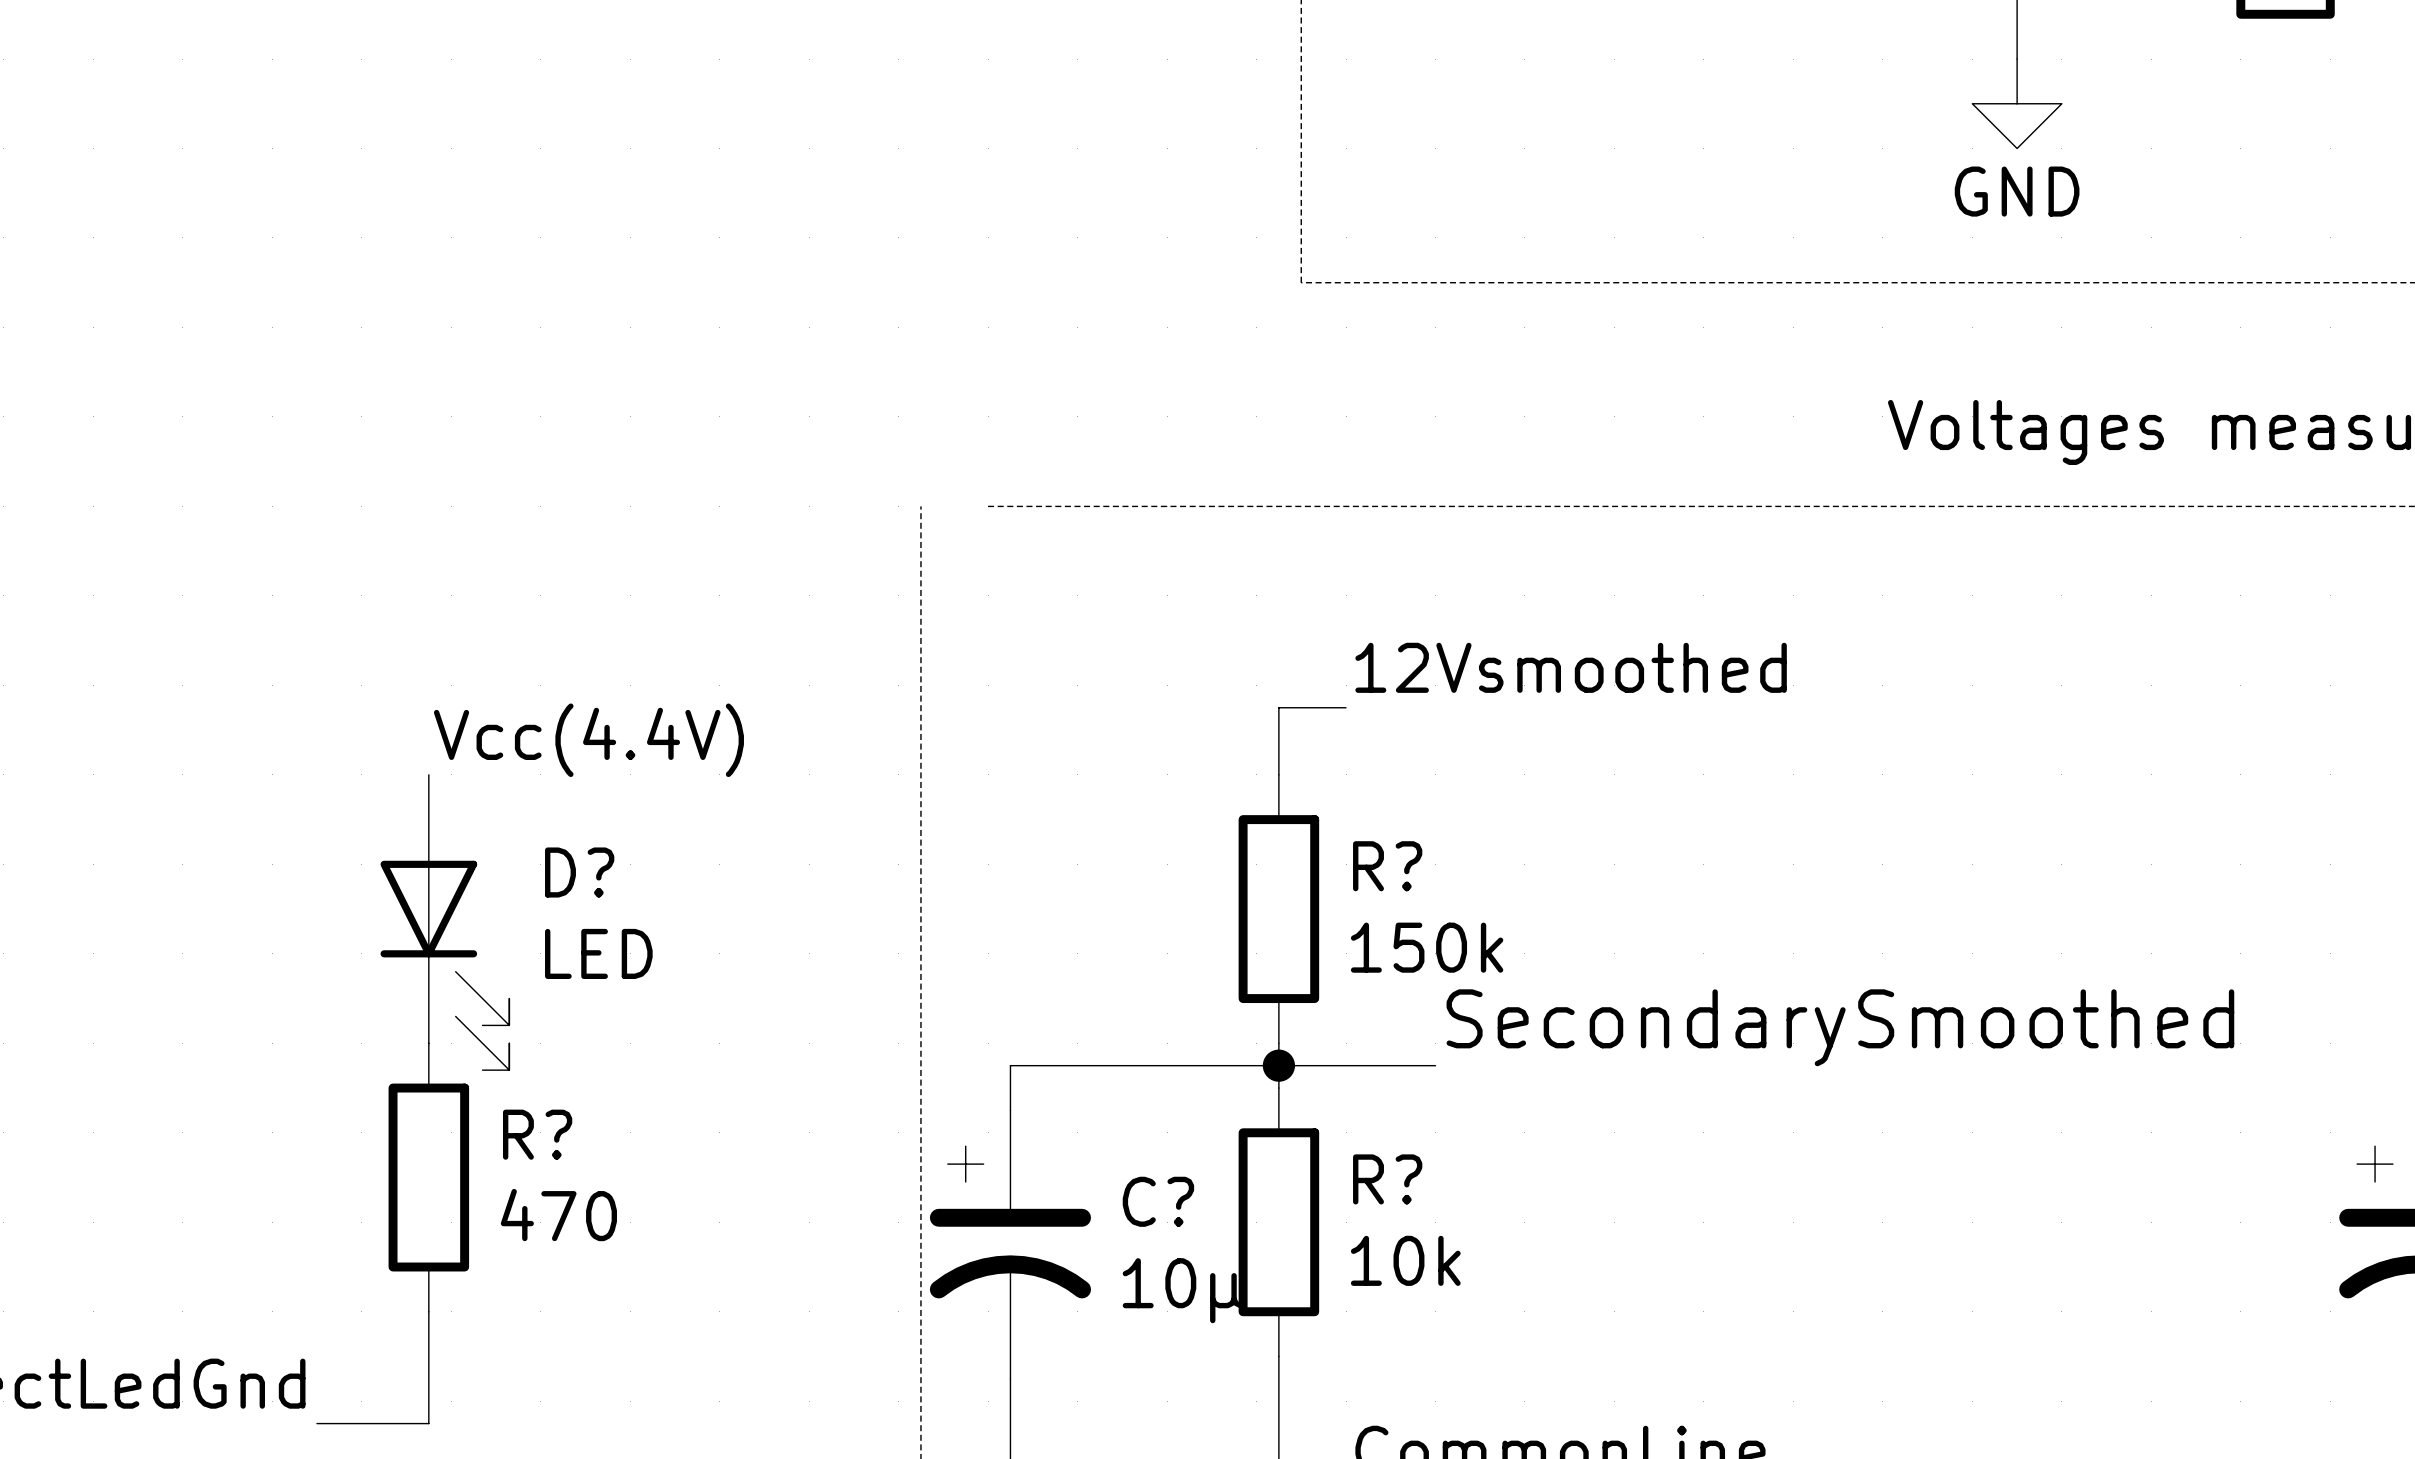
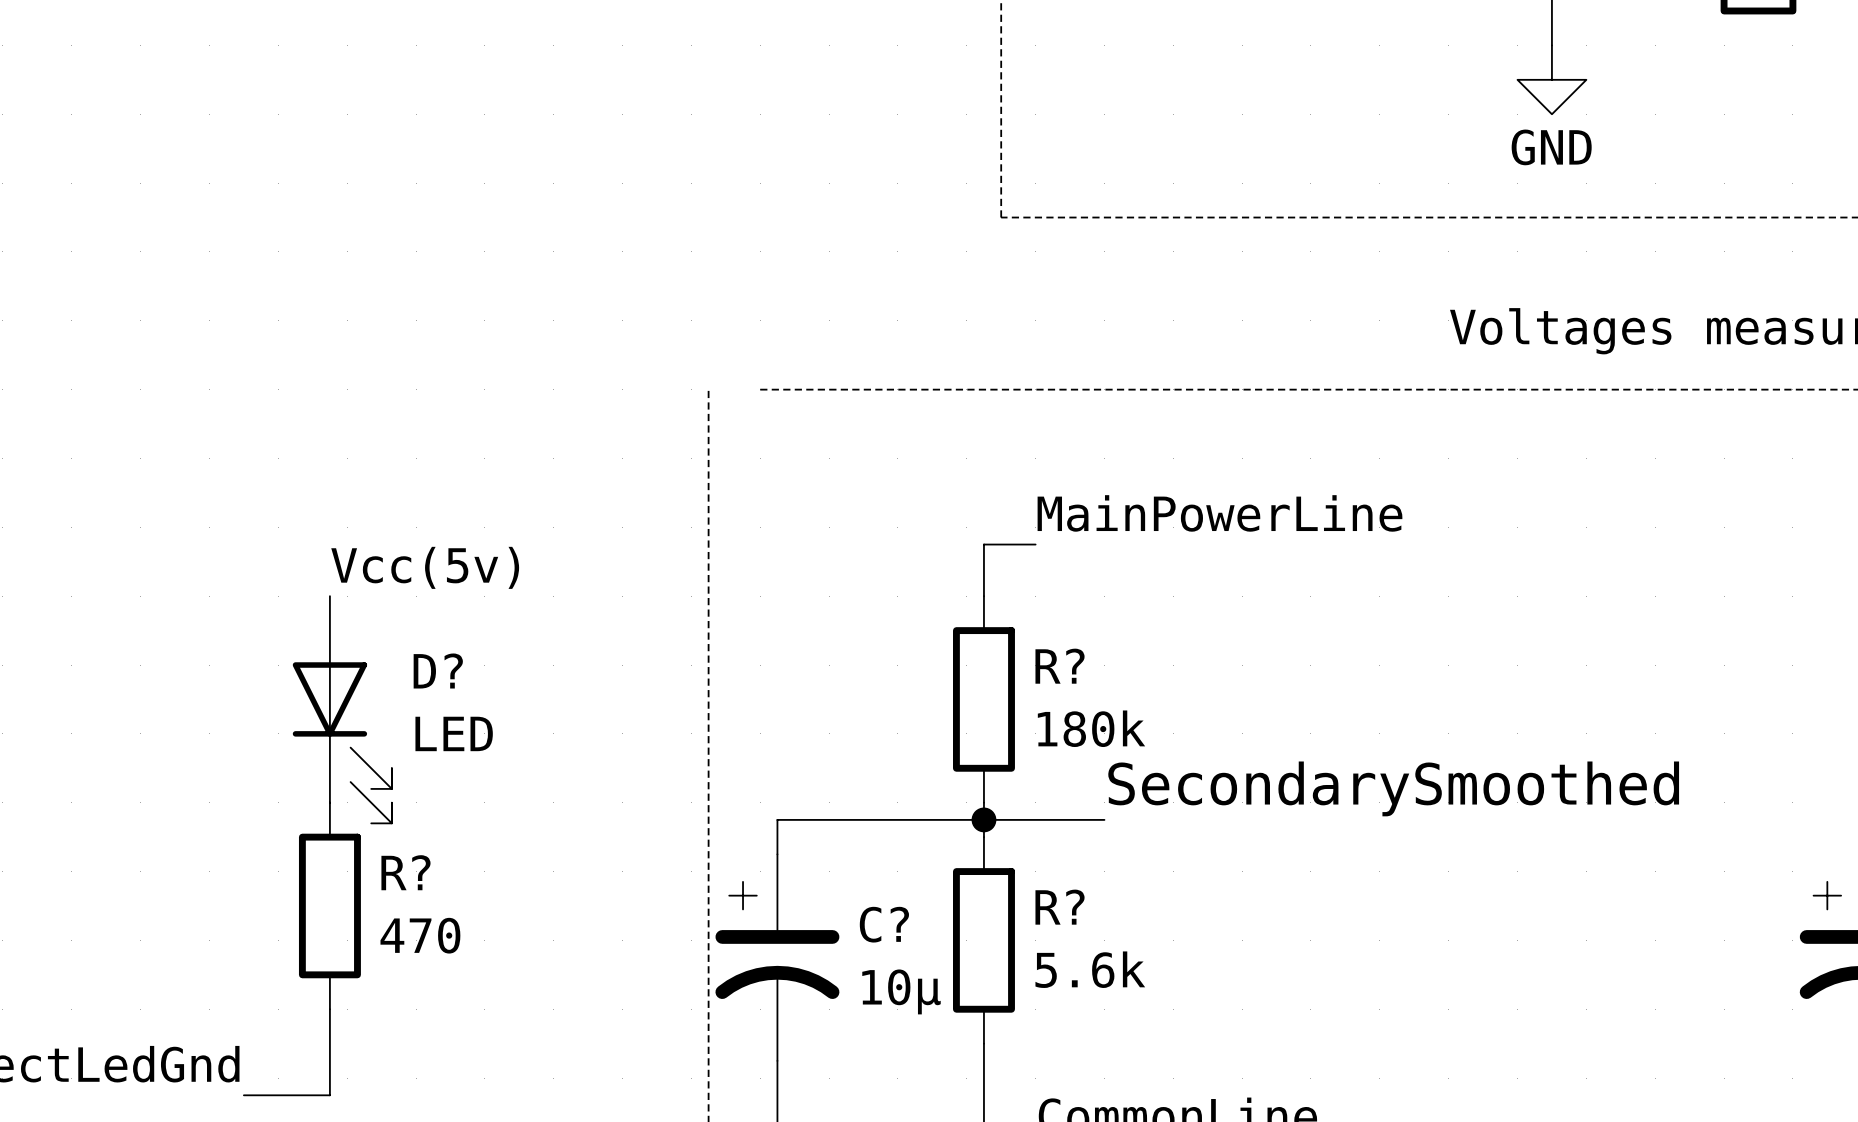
label: 12Vsmoothed (1571, 667) -> MainPowerLine (1219, 513)
label: Vcc(4.4V) (588, 740) -> Vcc(5v) (425, 567)
R? value: 150k (1427, 947) -> 180k (1091, 728)
R? value: 10k (1405, 1260) -> 5.6k (1090, 969)

